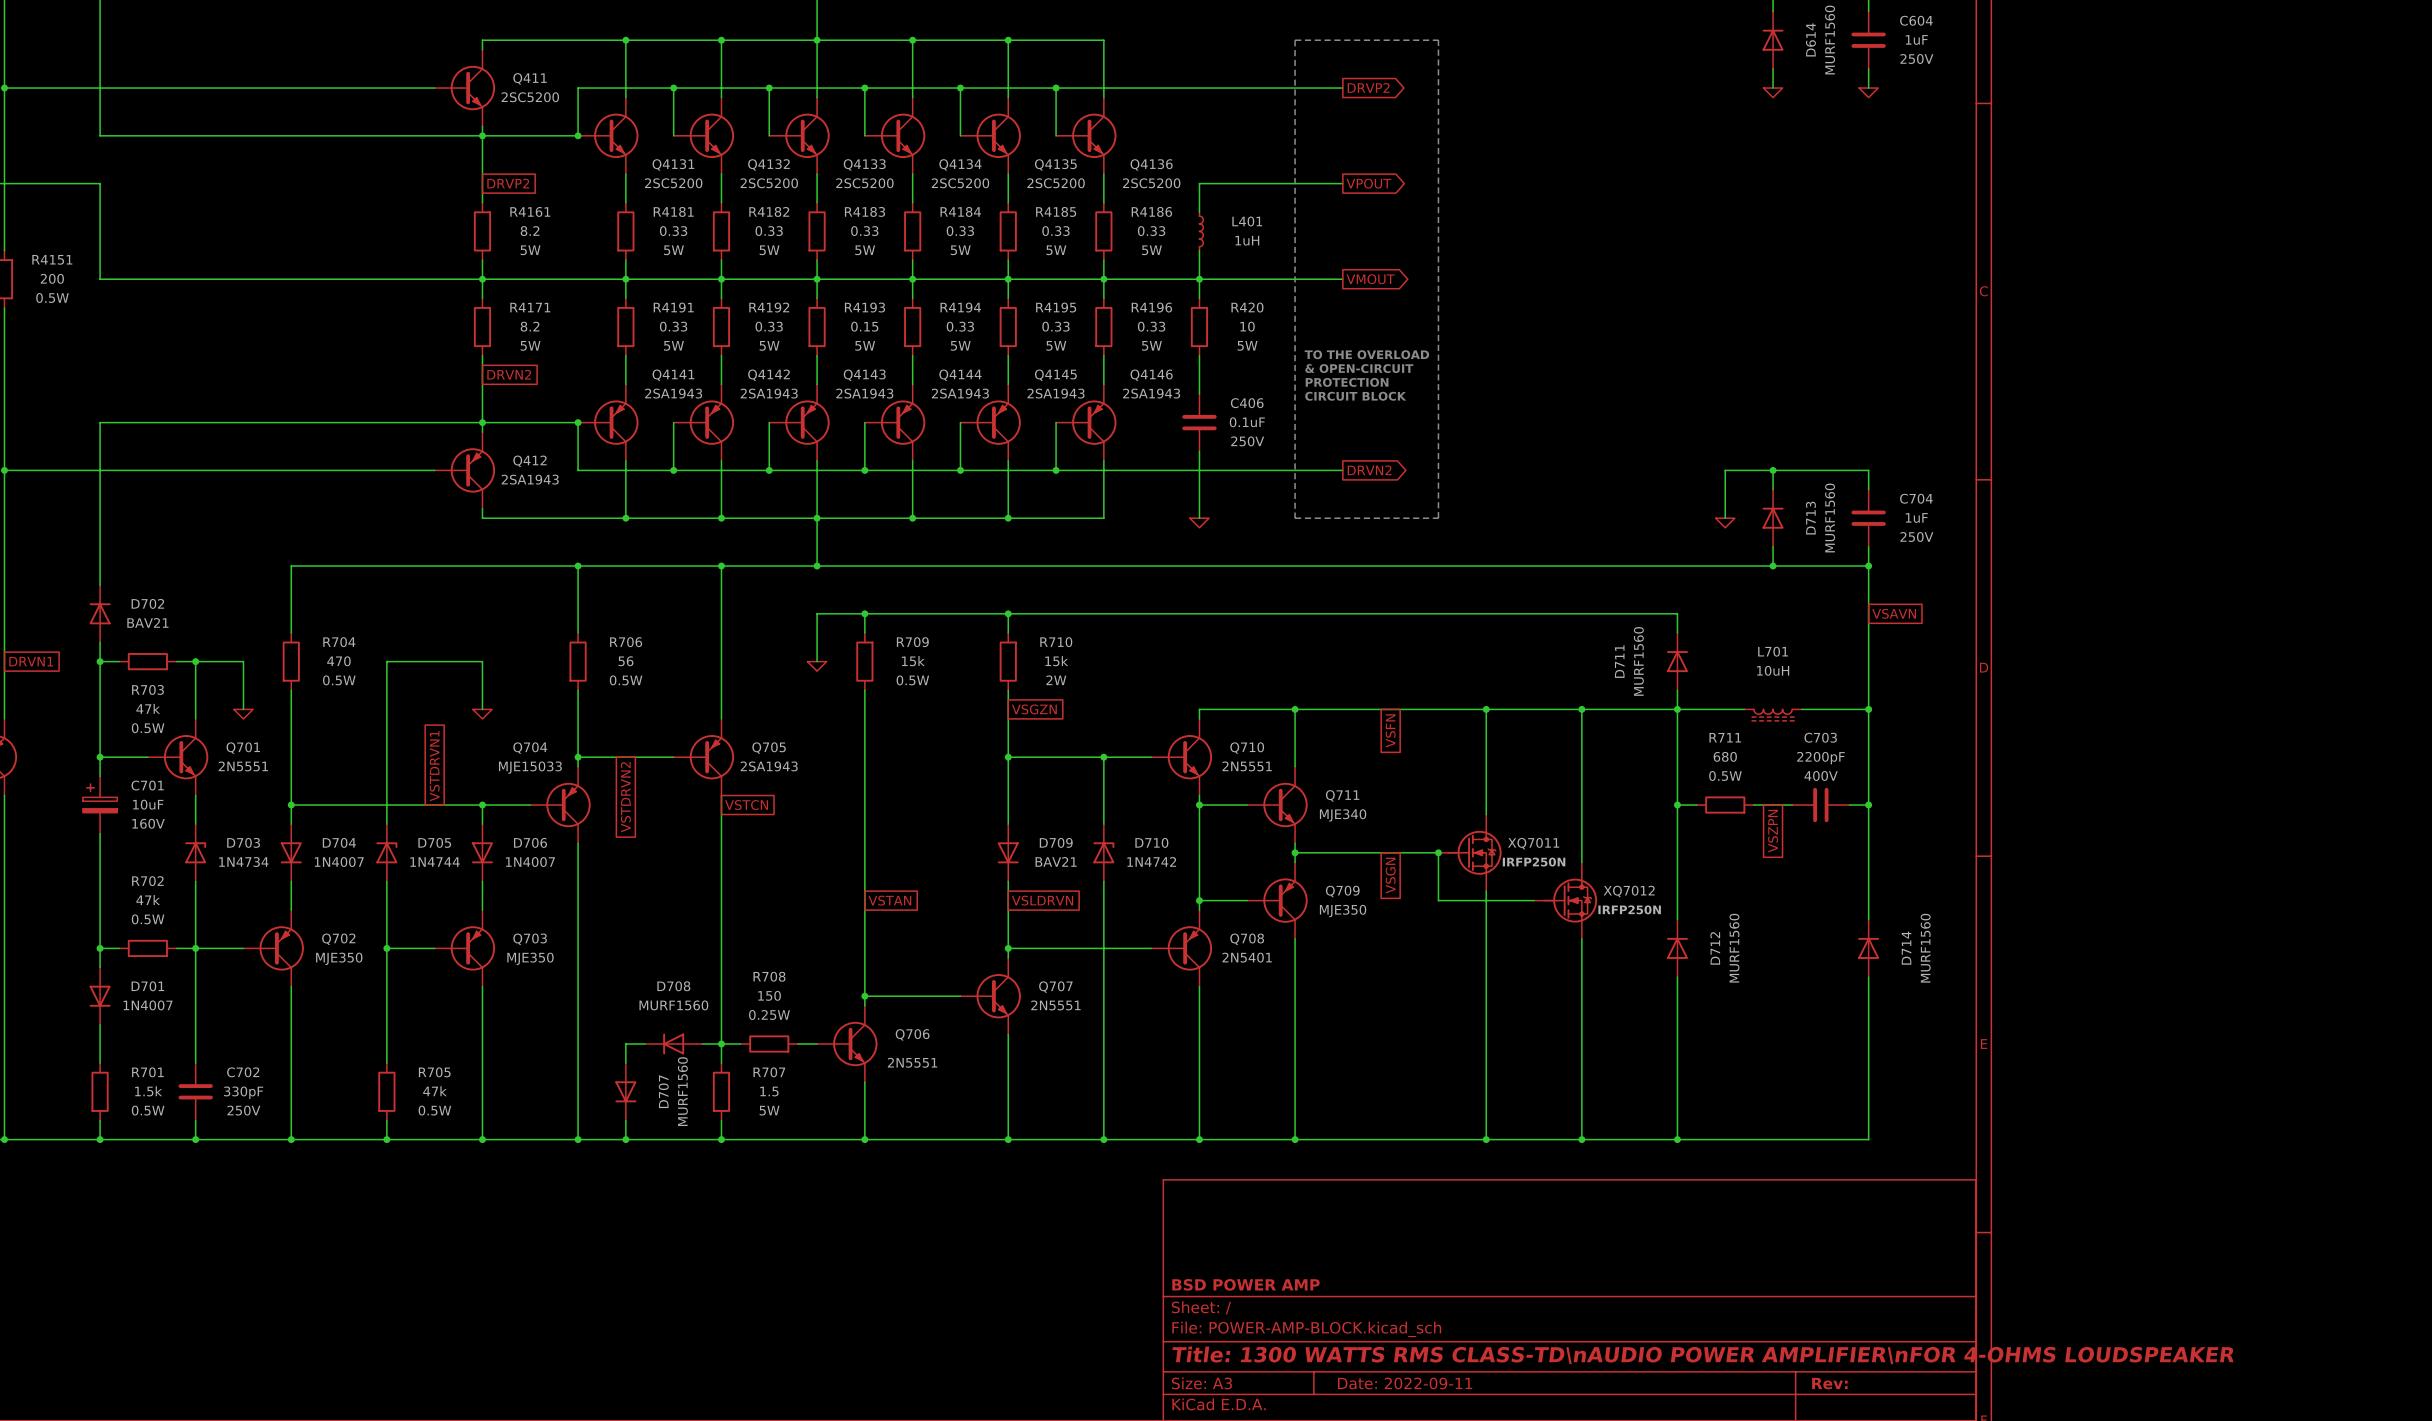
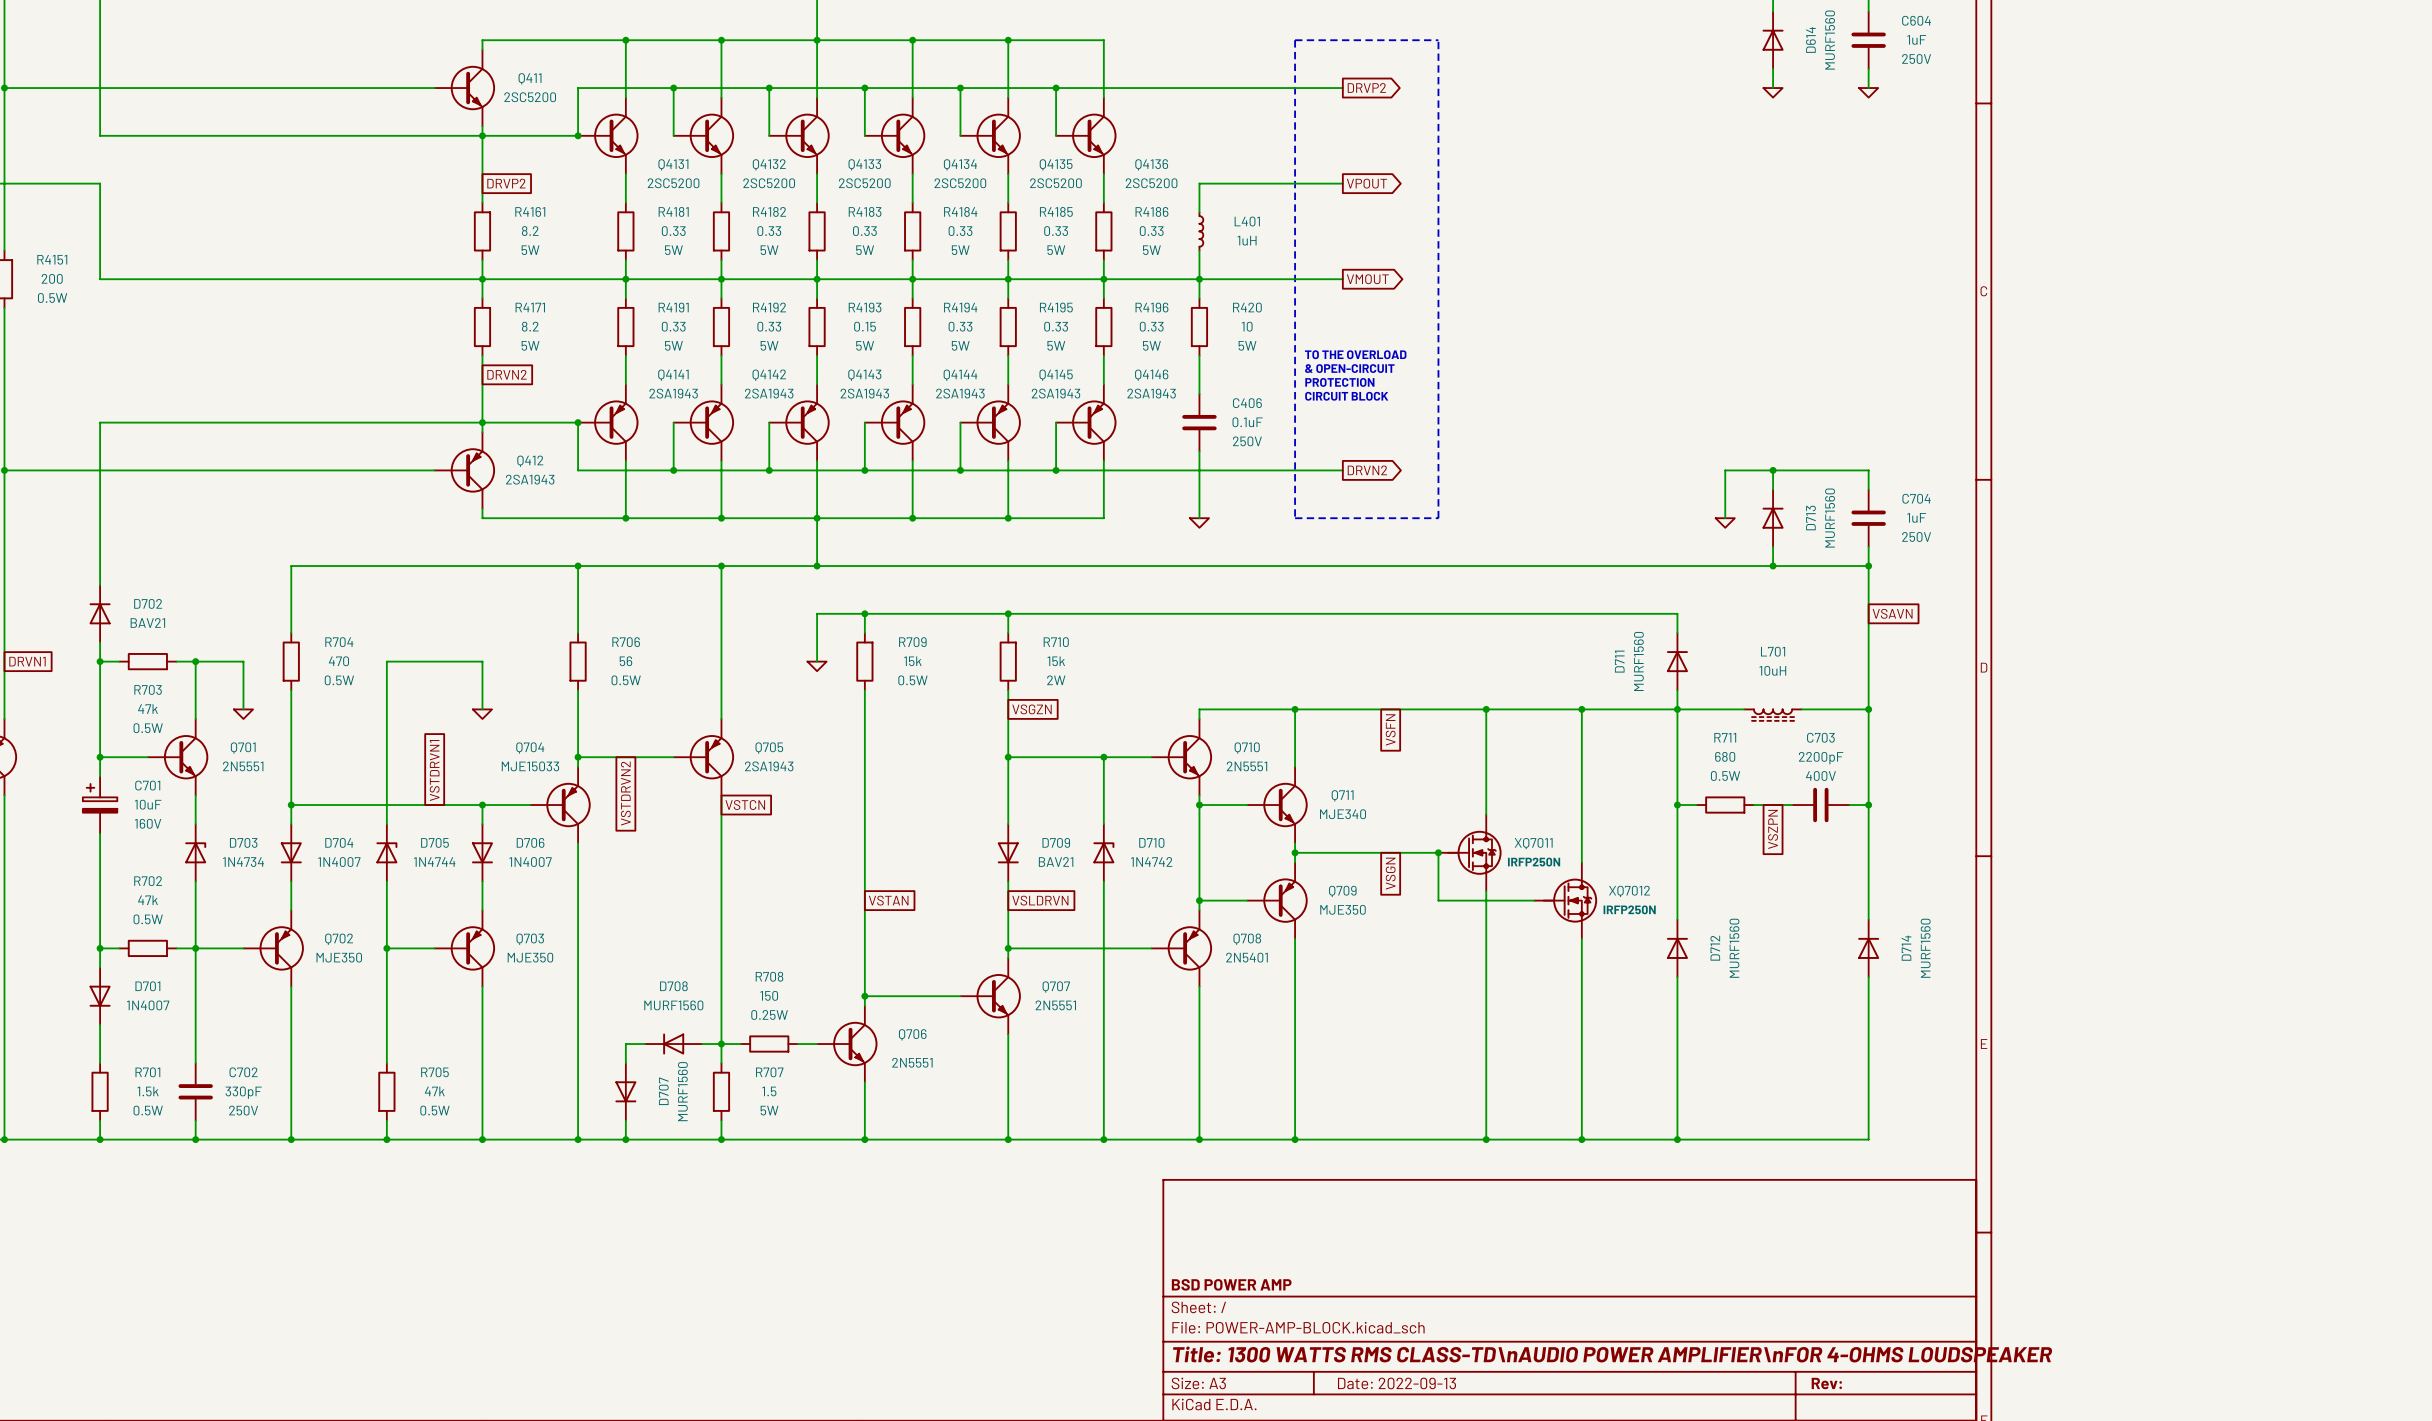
title block: Date: 2022-09-11 (1405, 1383) -> Date: 2022-09-13 (1396, 1383)

